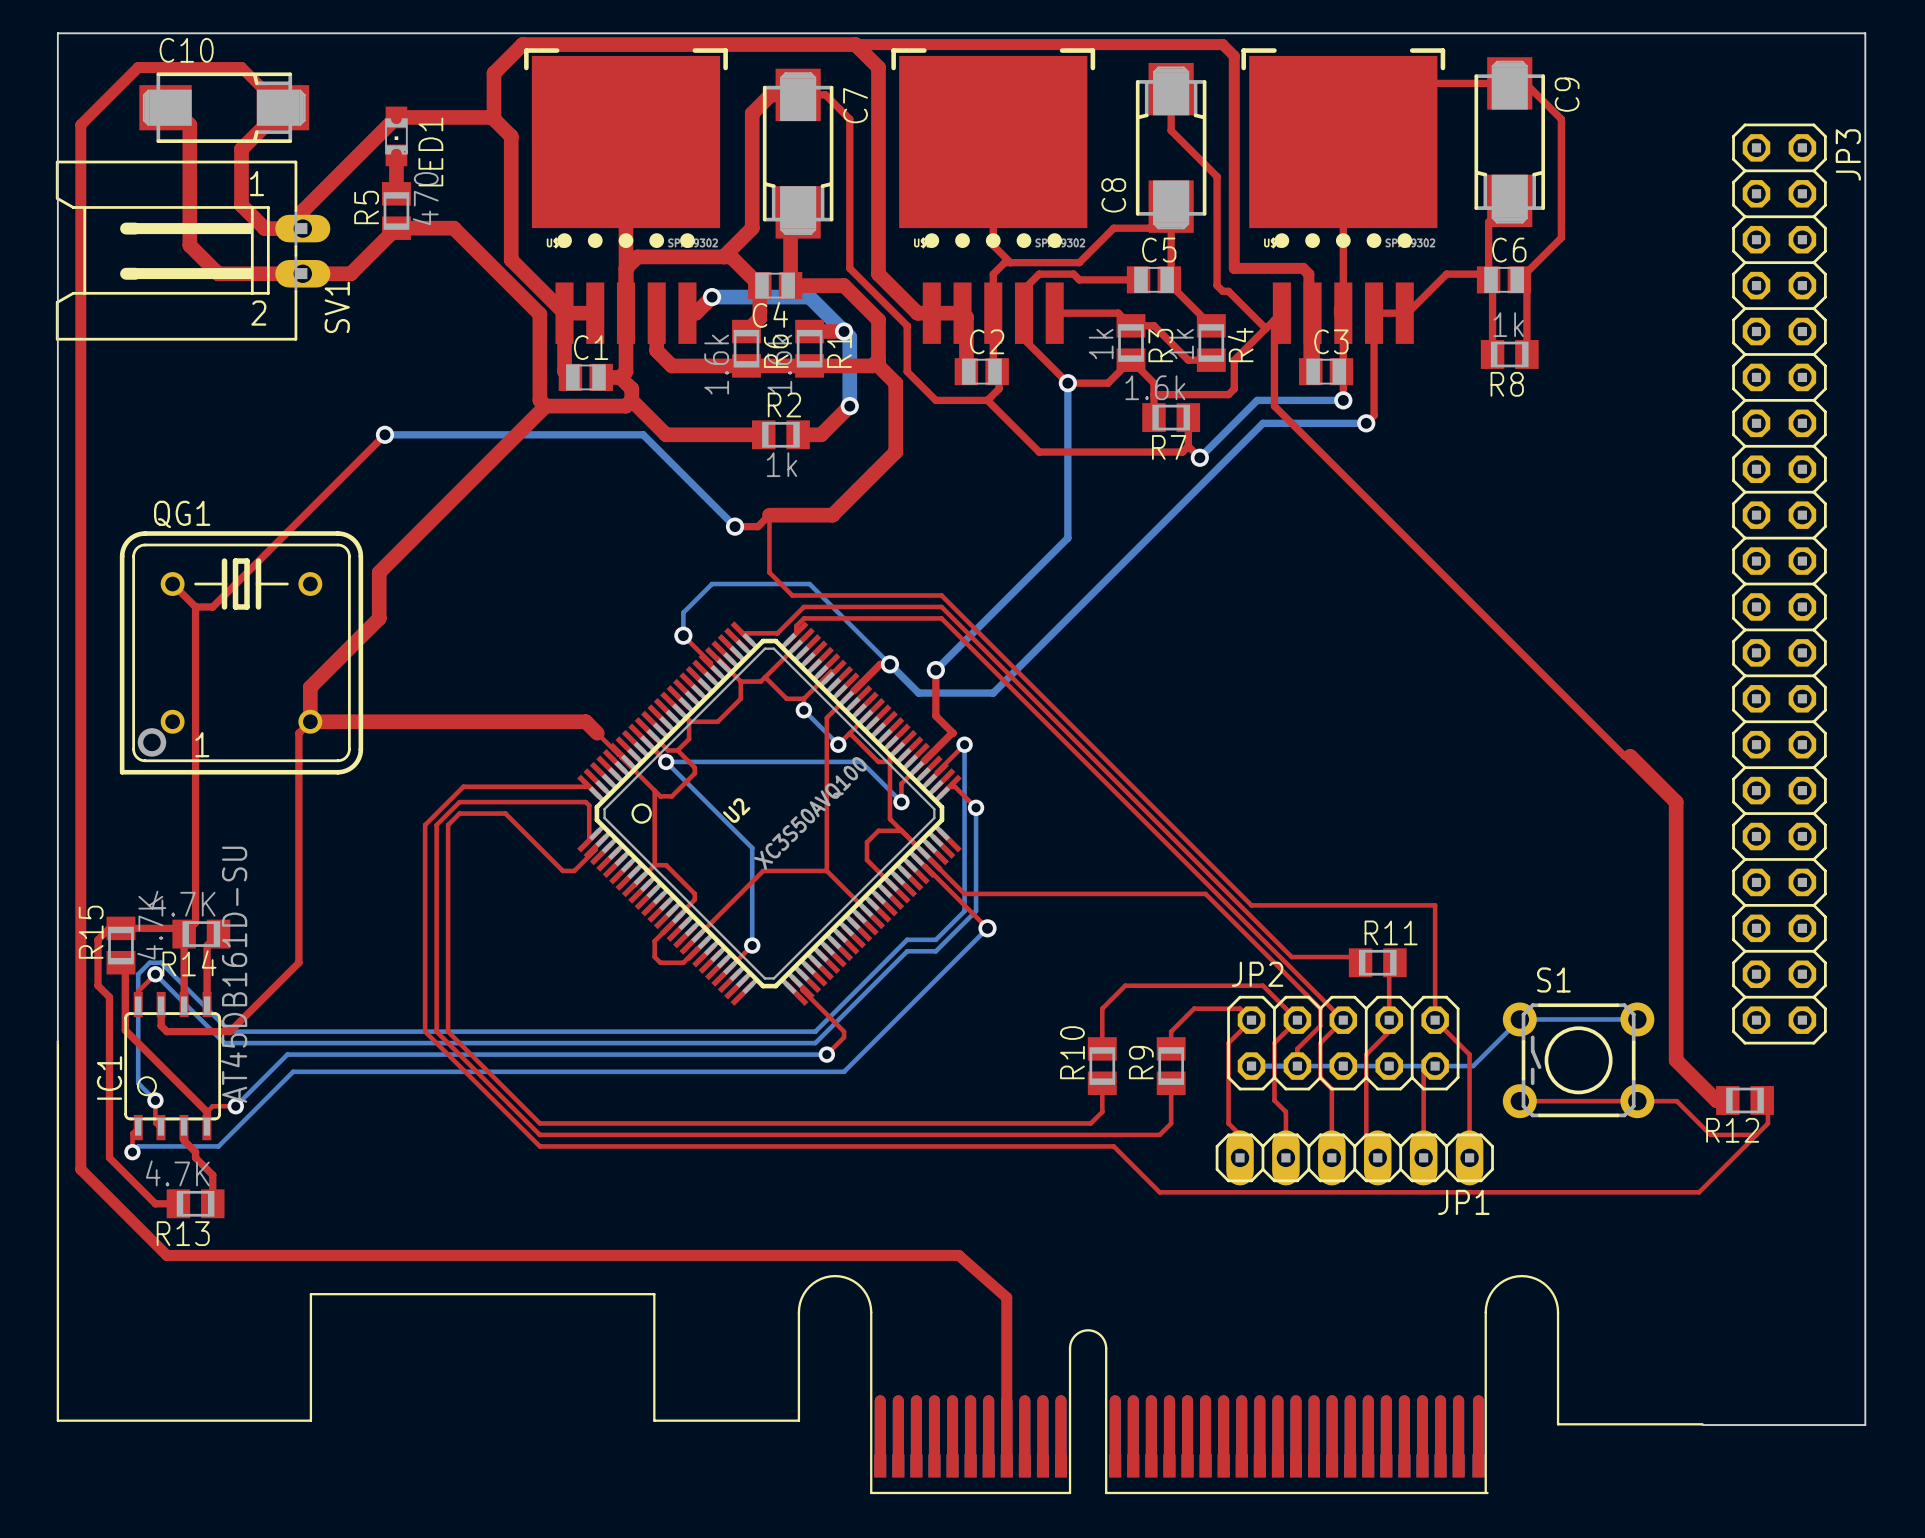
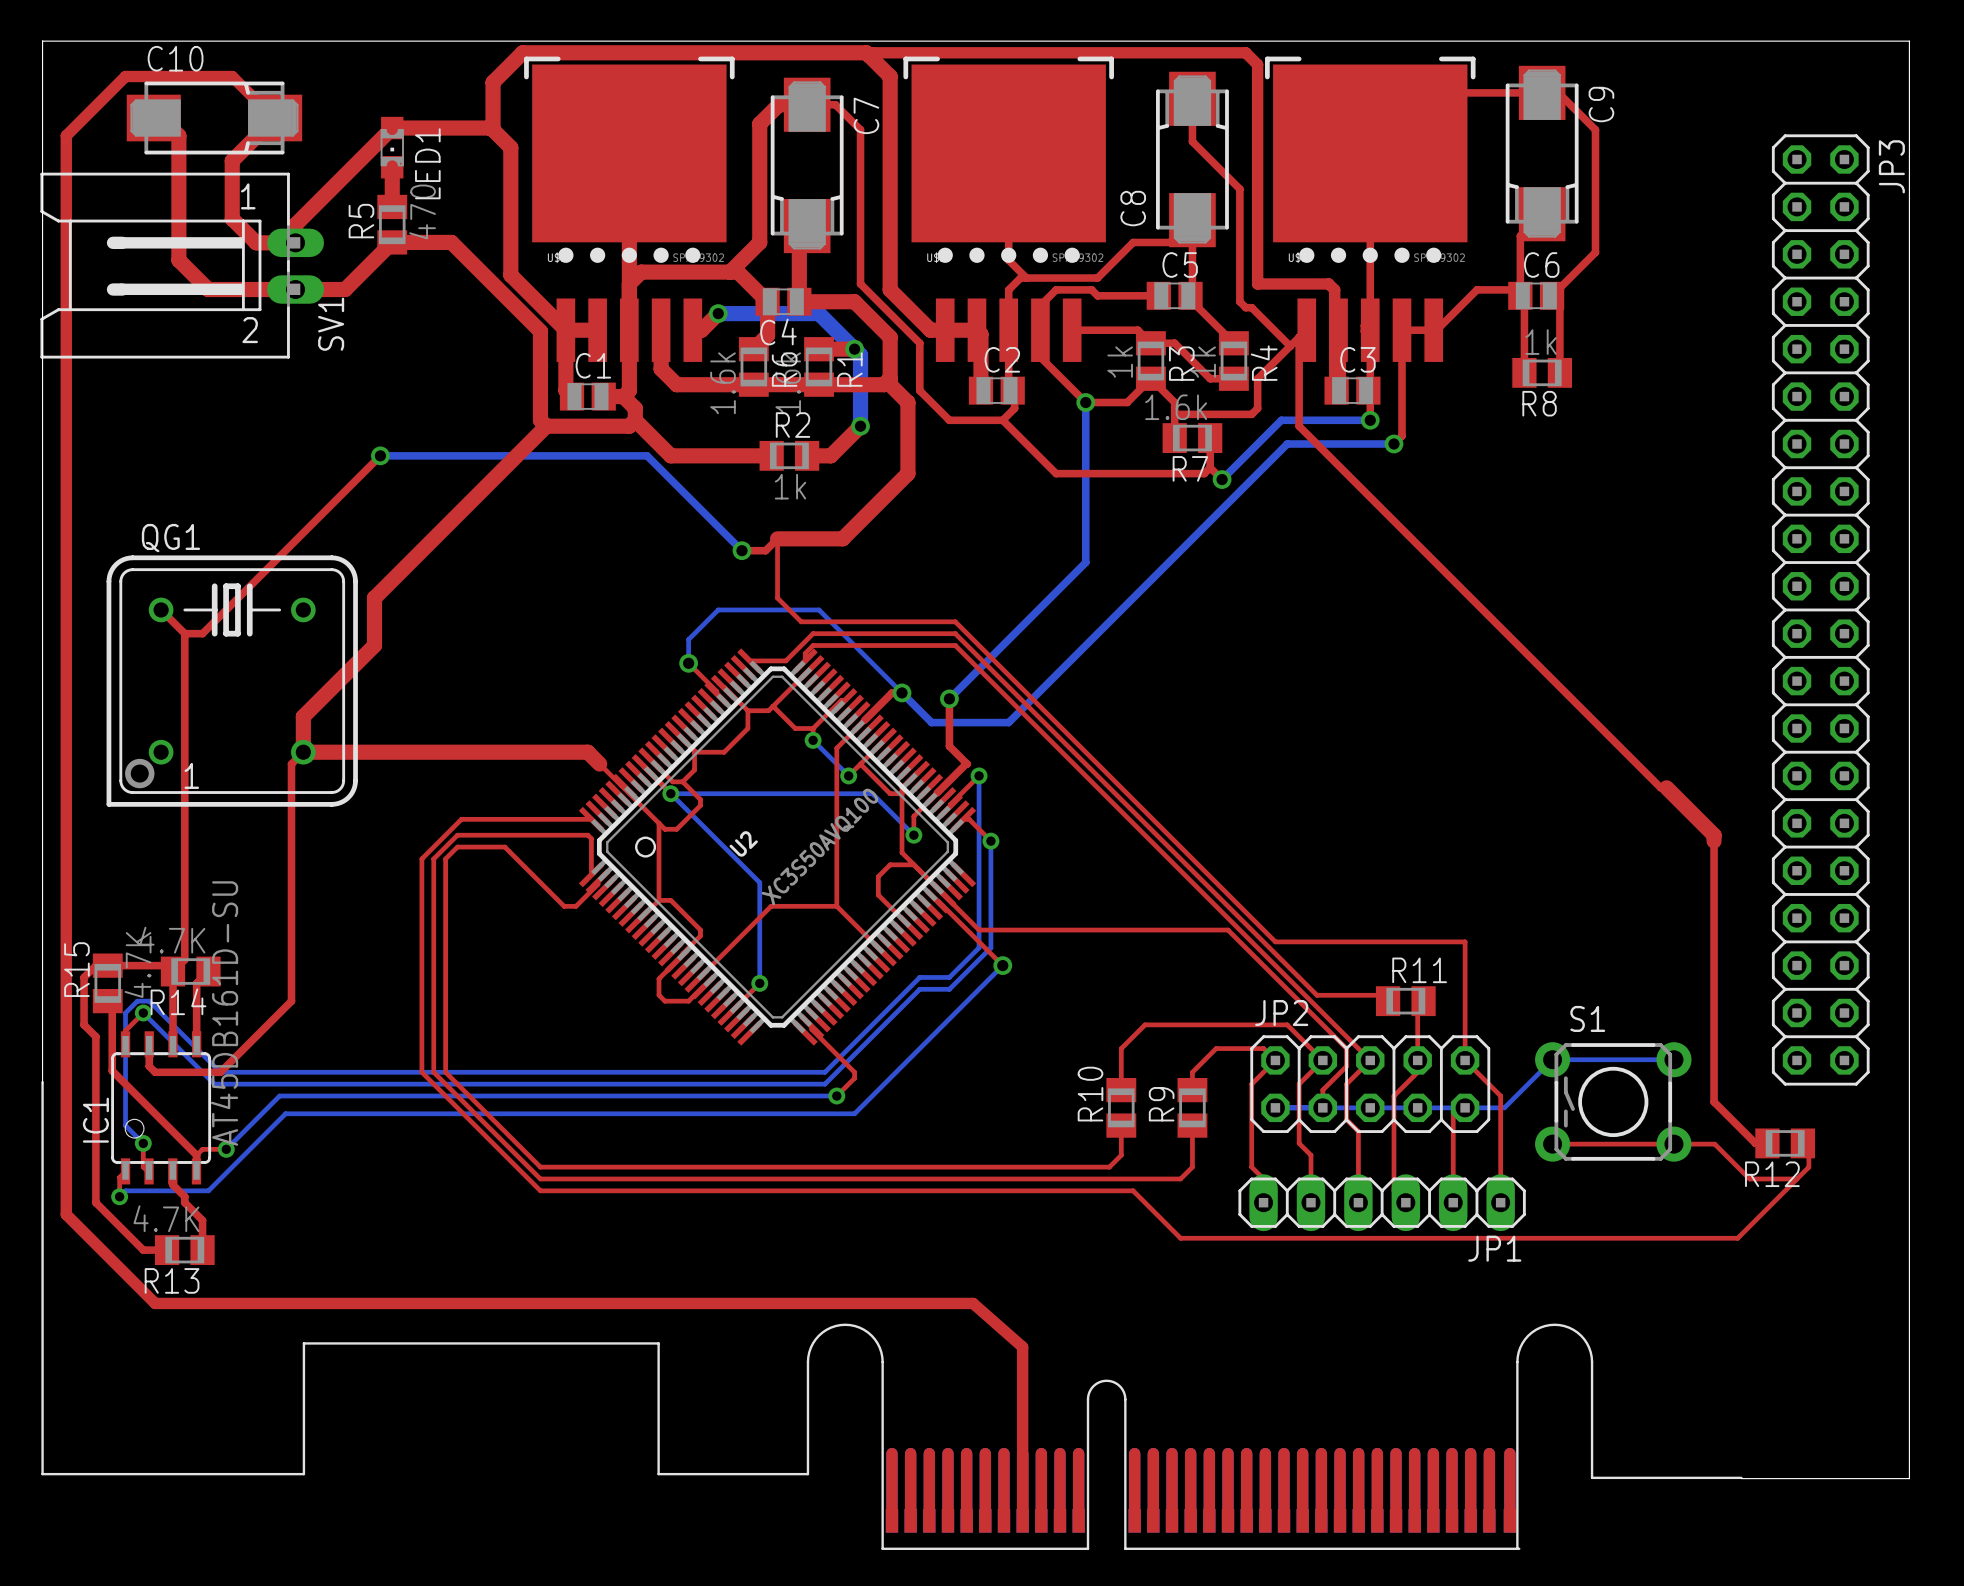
top track width: thick (1676, 807) (1676, 1060) (1716, 1100) (1727, 1100) -> thin (1714, 841) (1714, 1101) (1755, 1143) (1767, 1143)

